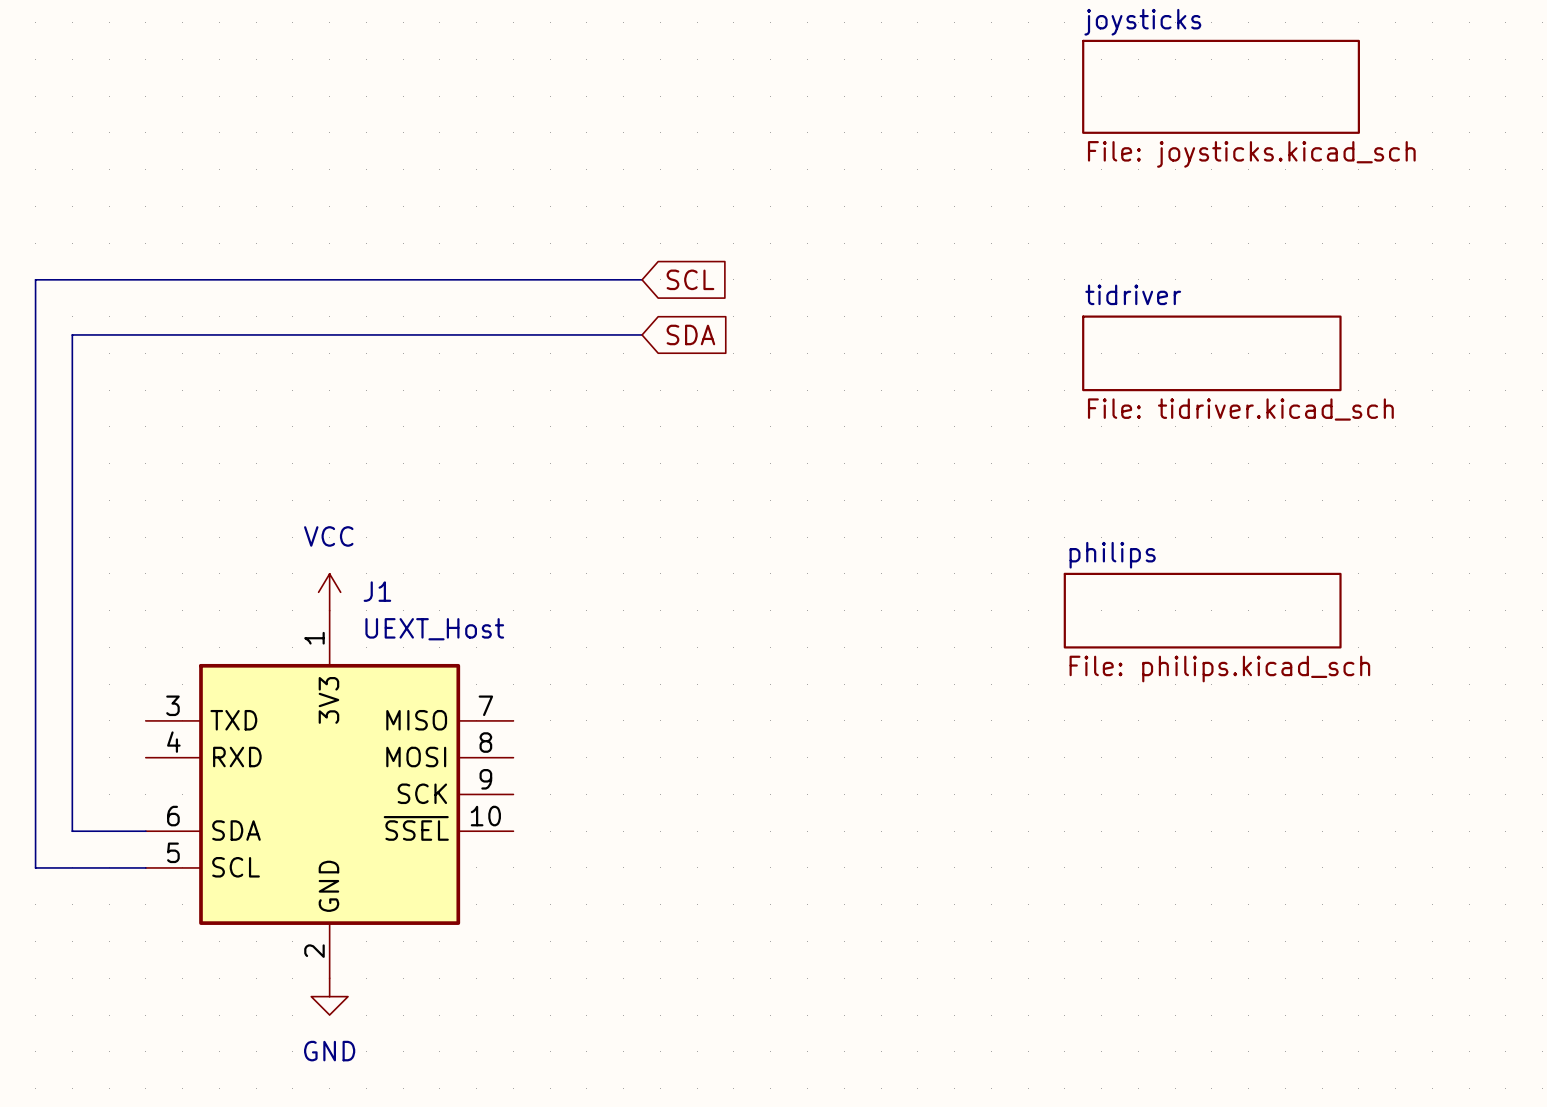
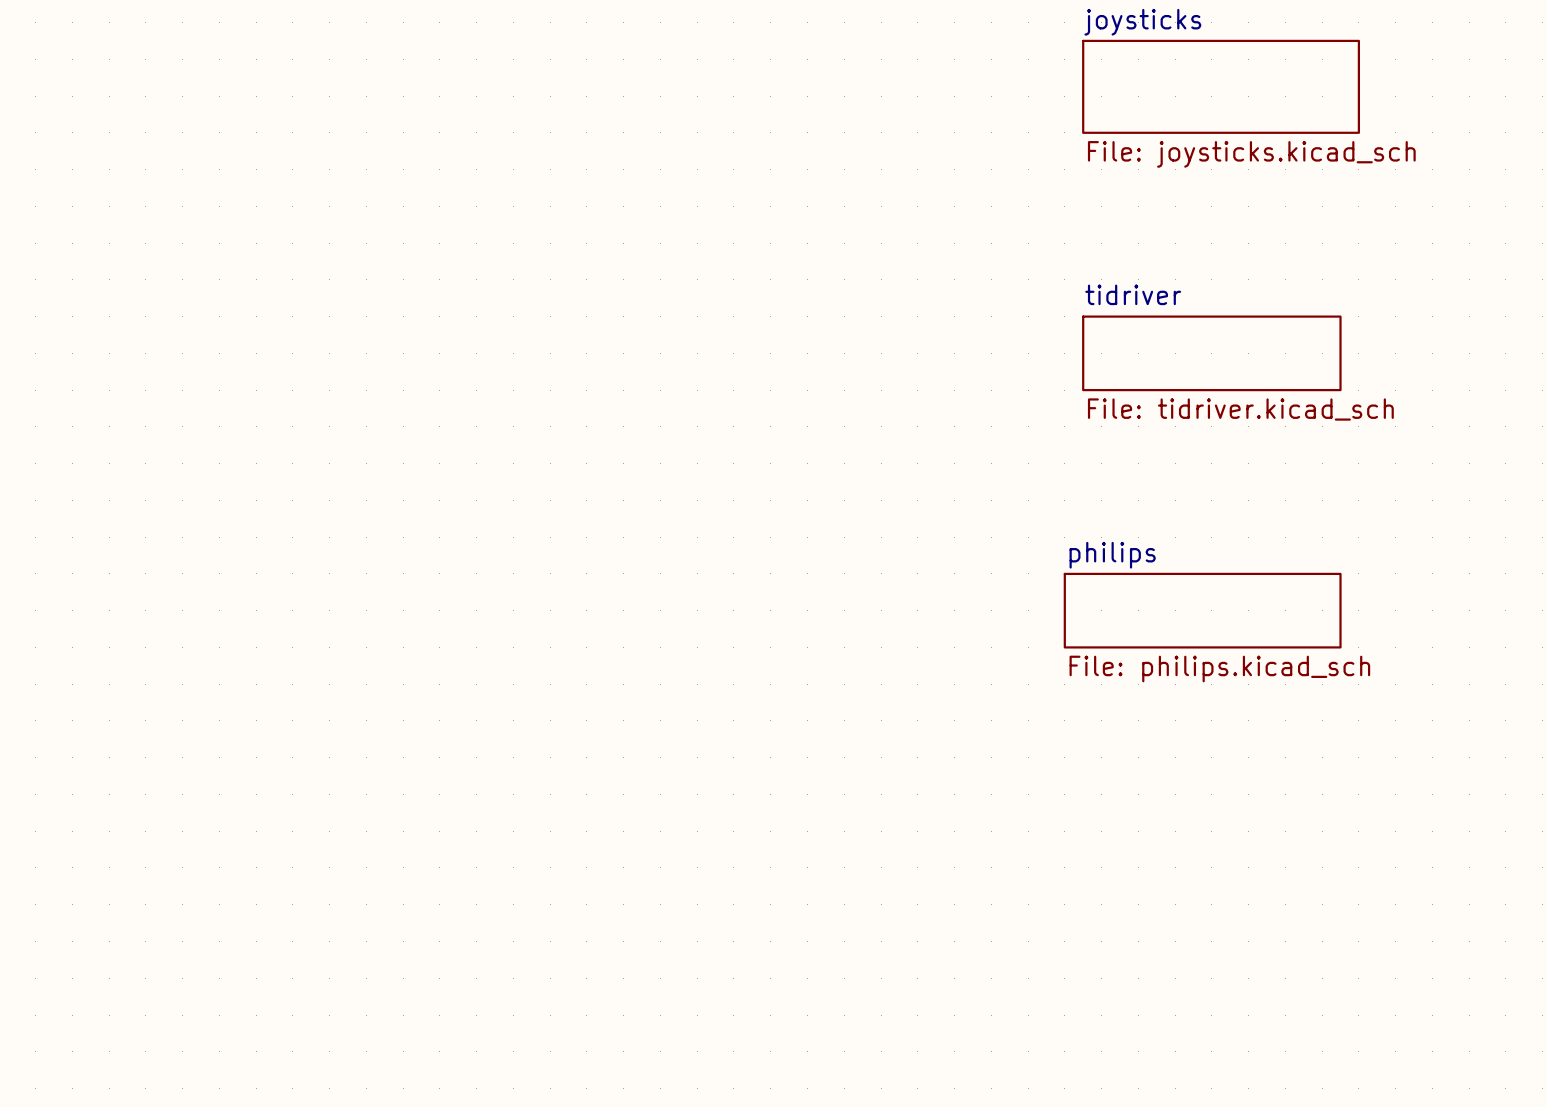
wire: (642, 279) (35, 279) (35, 867) (145, 867) -> none
global label: SCL (690, 279) -> none
wire: (642, 334) (72, 334) (72, 831) (145, 831) -> none
global label: SDA (690, 334) -> none
power symbol: VCC (329, 592) -> none
J1: UEXT_Host (329, 794) -> none
power symbol: GND (329, 996) -> none

